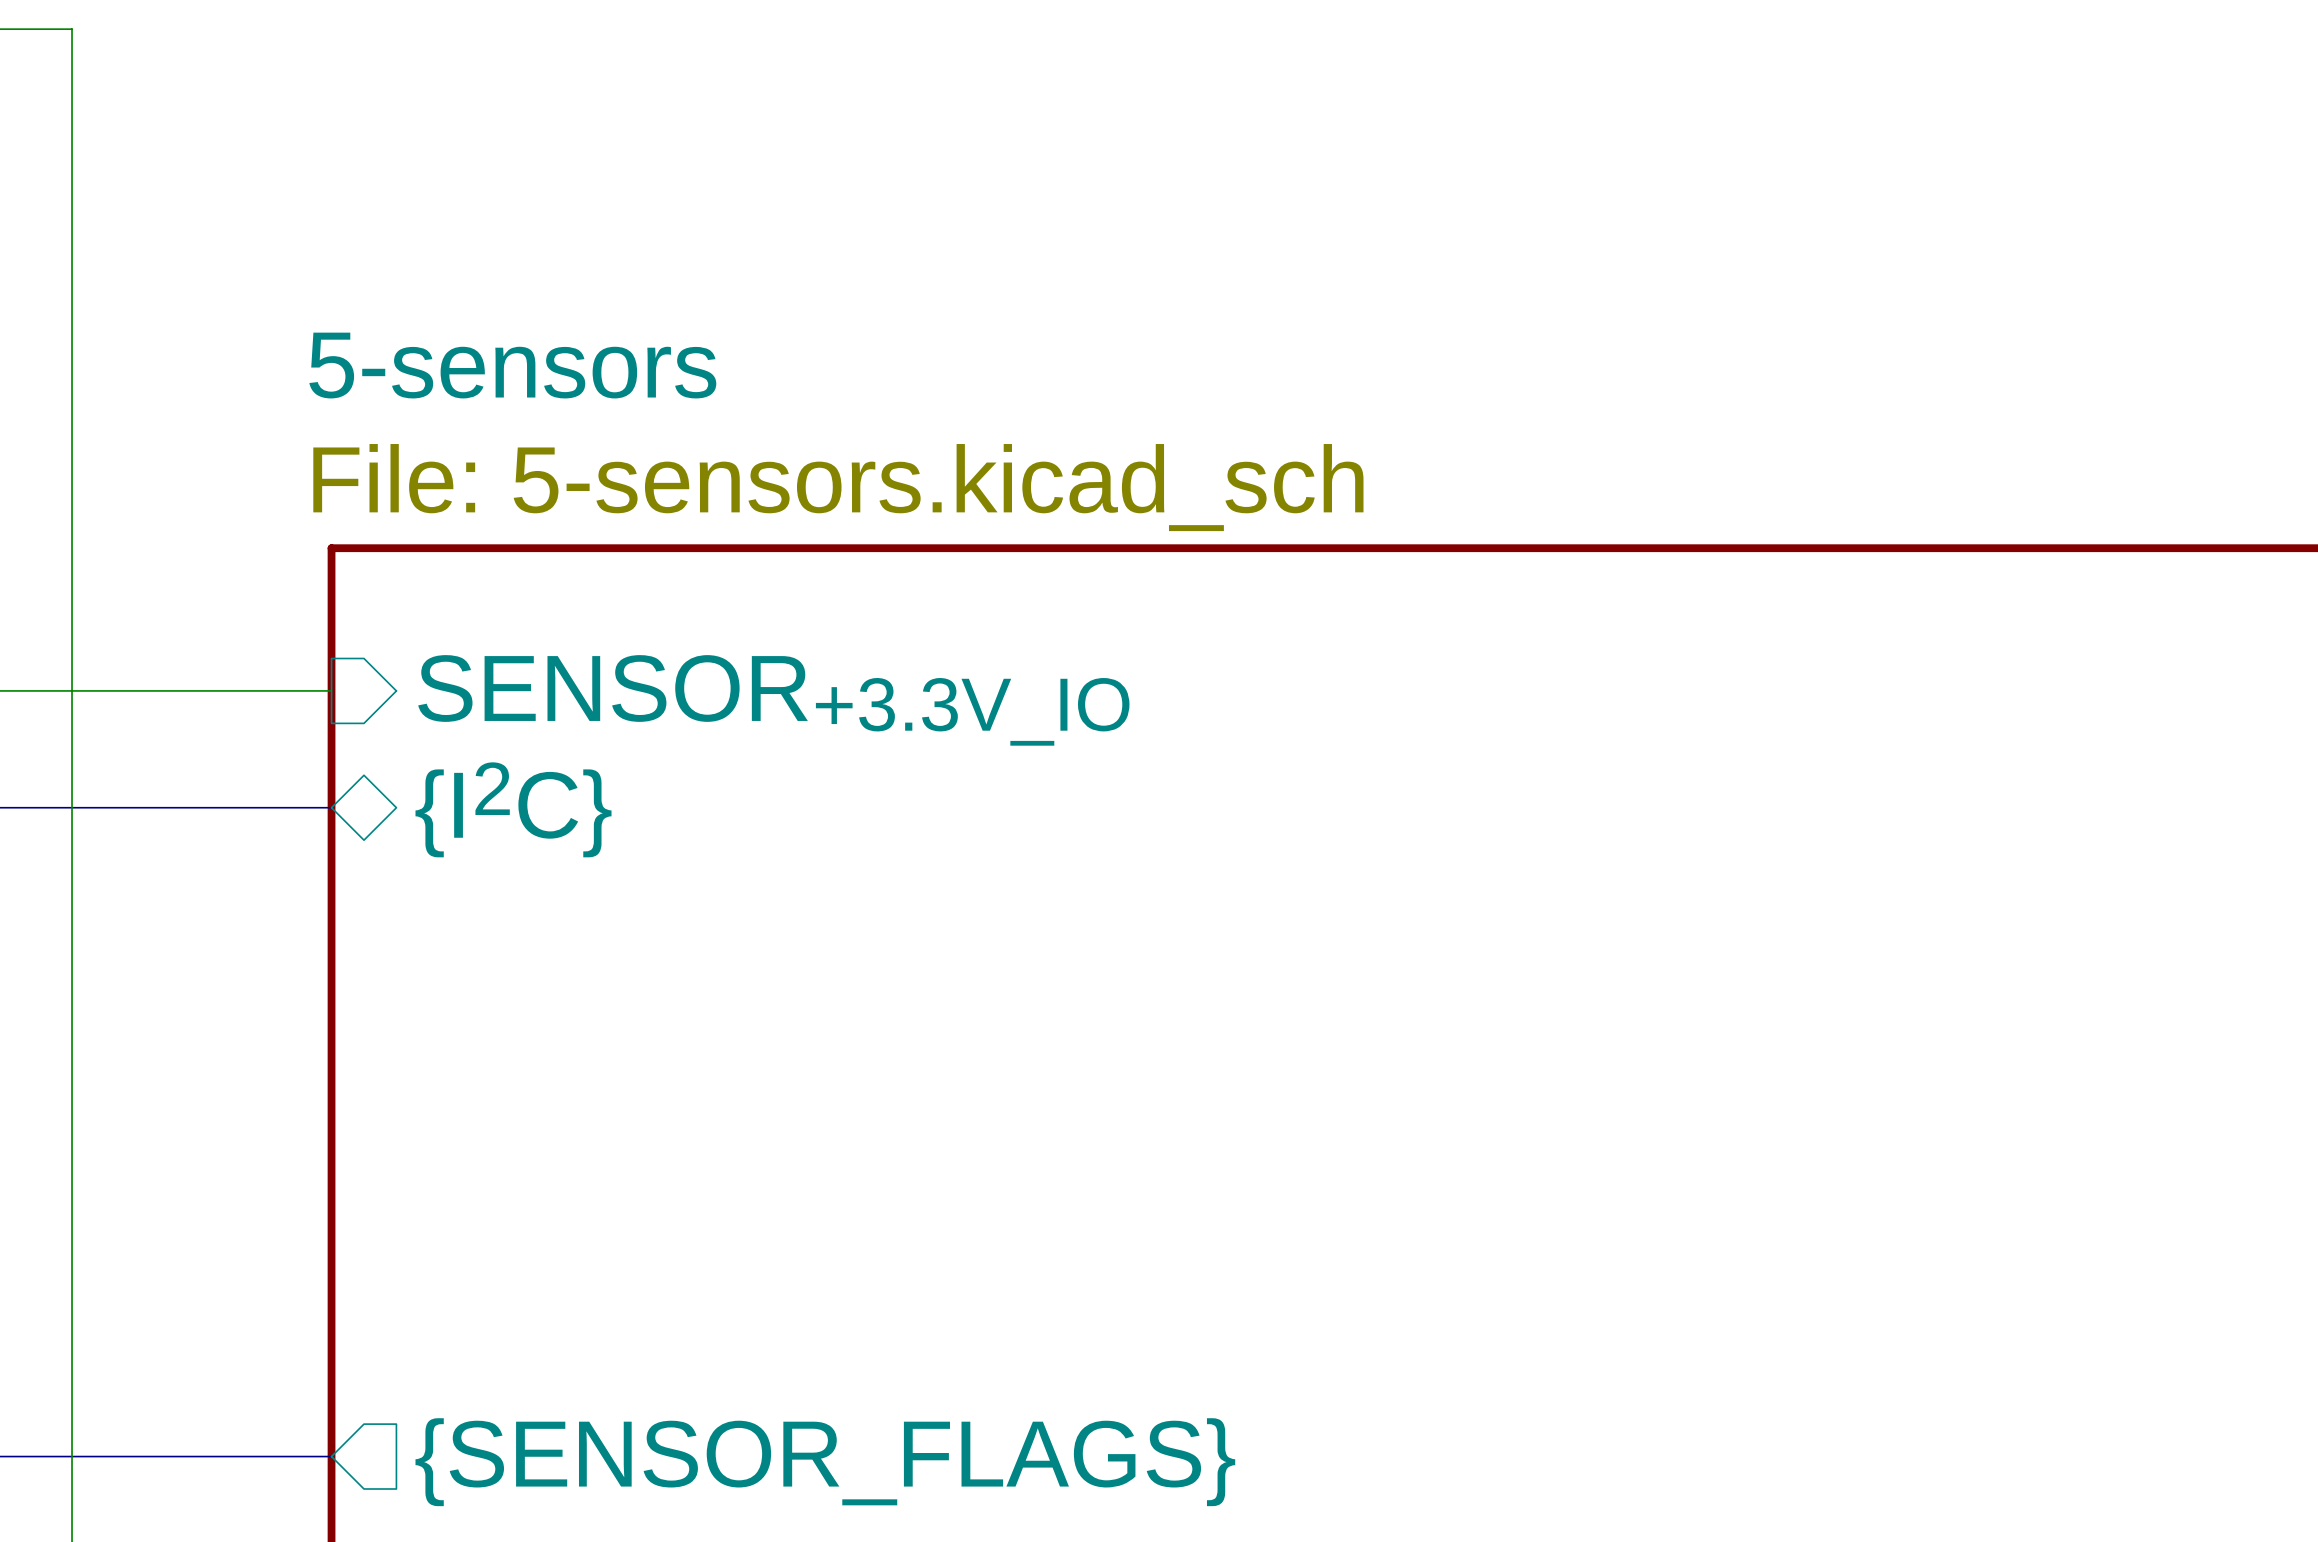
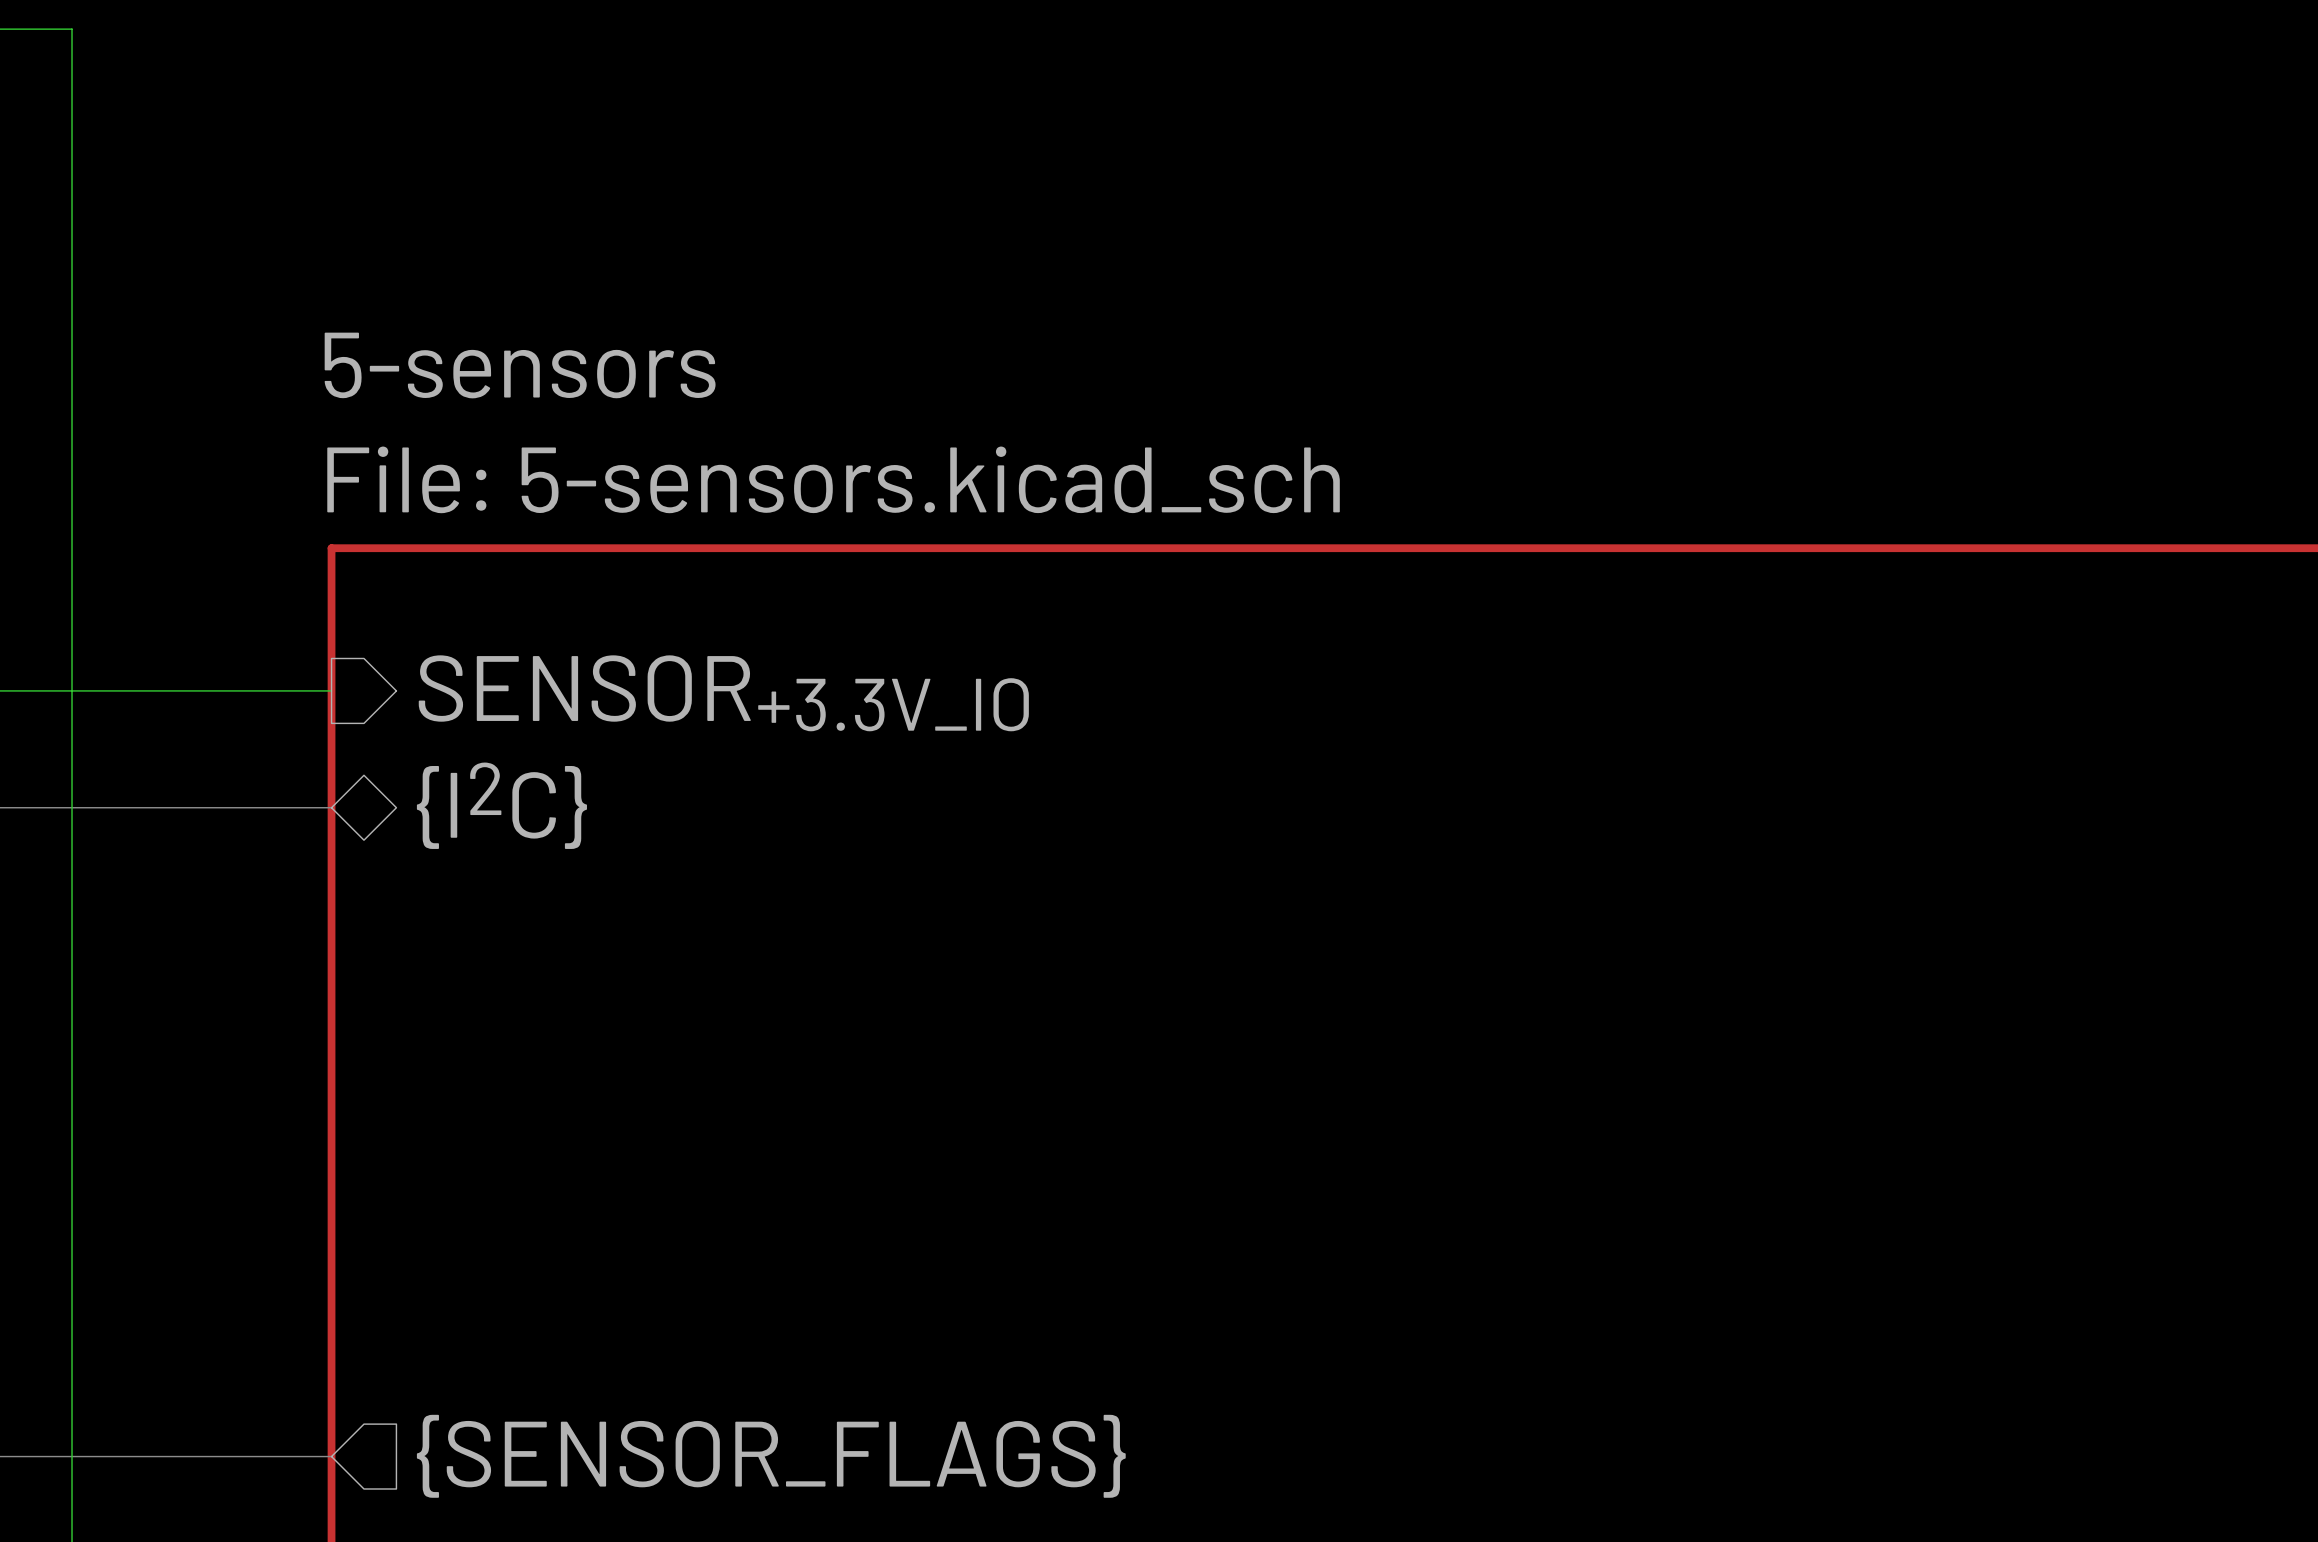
sheet 5-sensors name position: 5-sensors (512, 365) -> 5-sensors (520, 365)
sheet 5-sensors value position: File: 5-sensors.kicad_sch (838, 487) -> File: 5-sensors.kicad_sch (833, 479)

